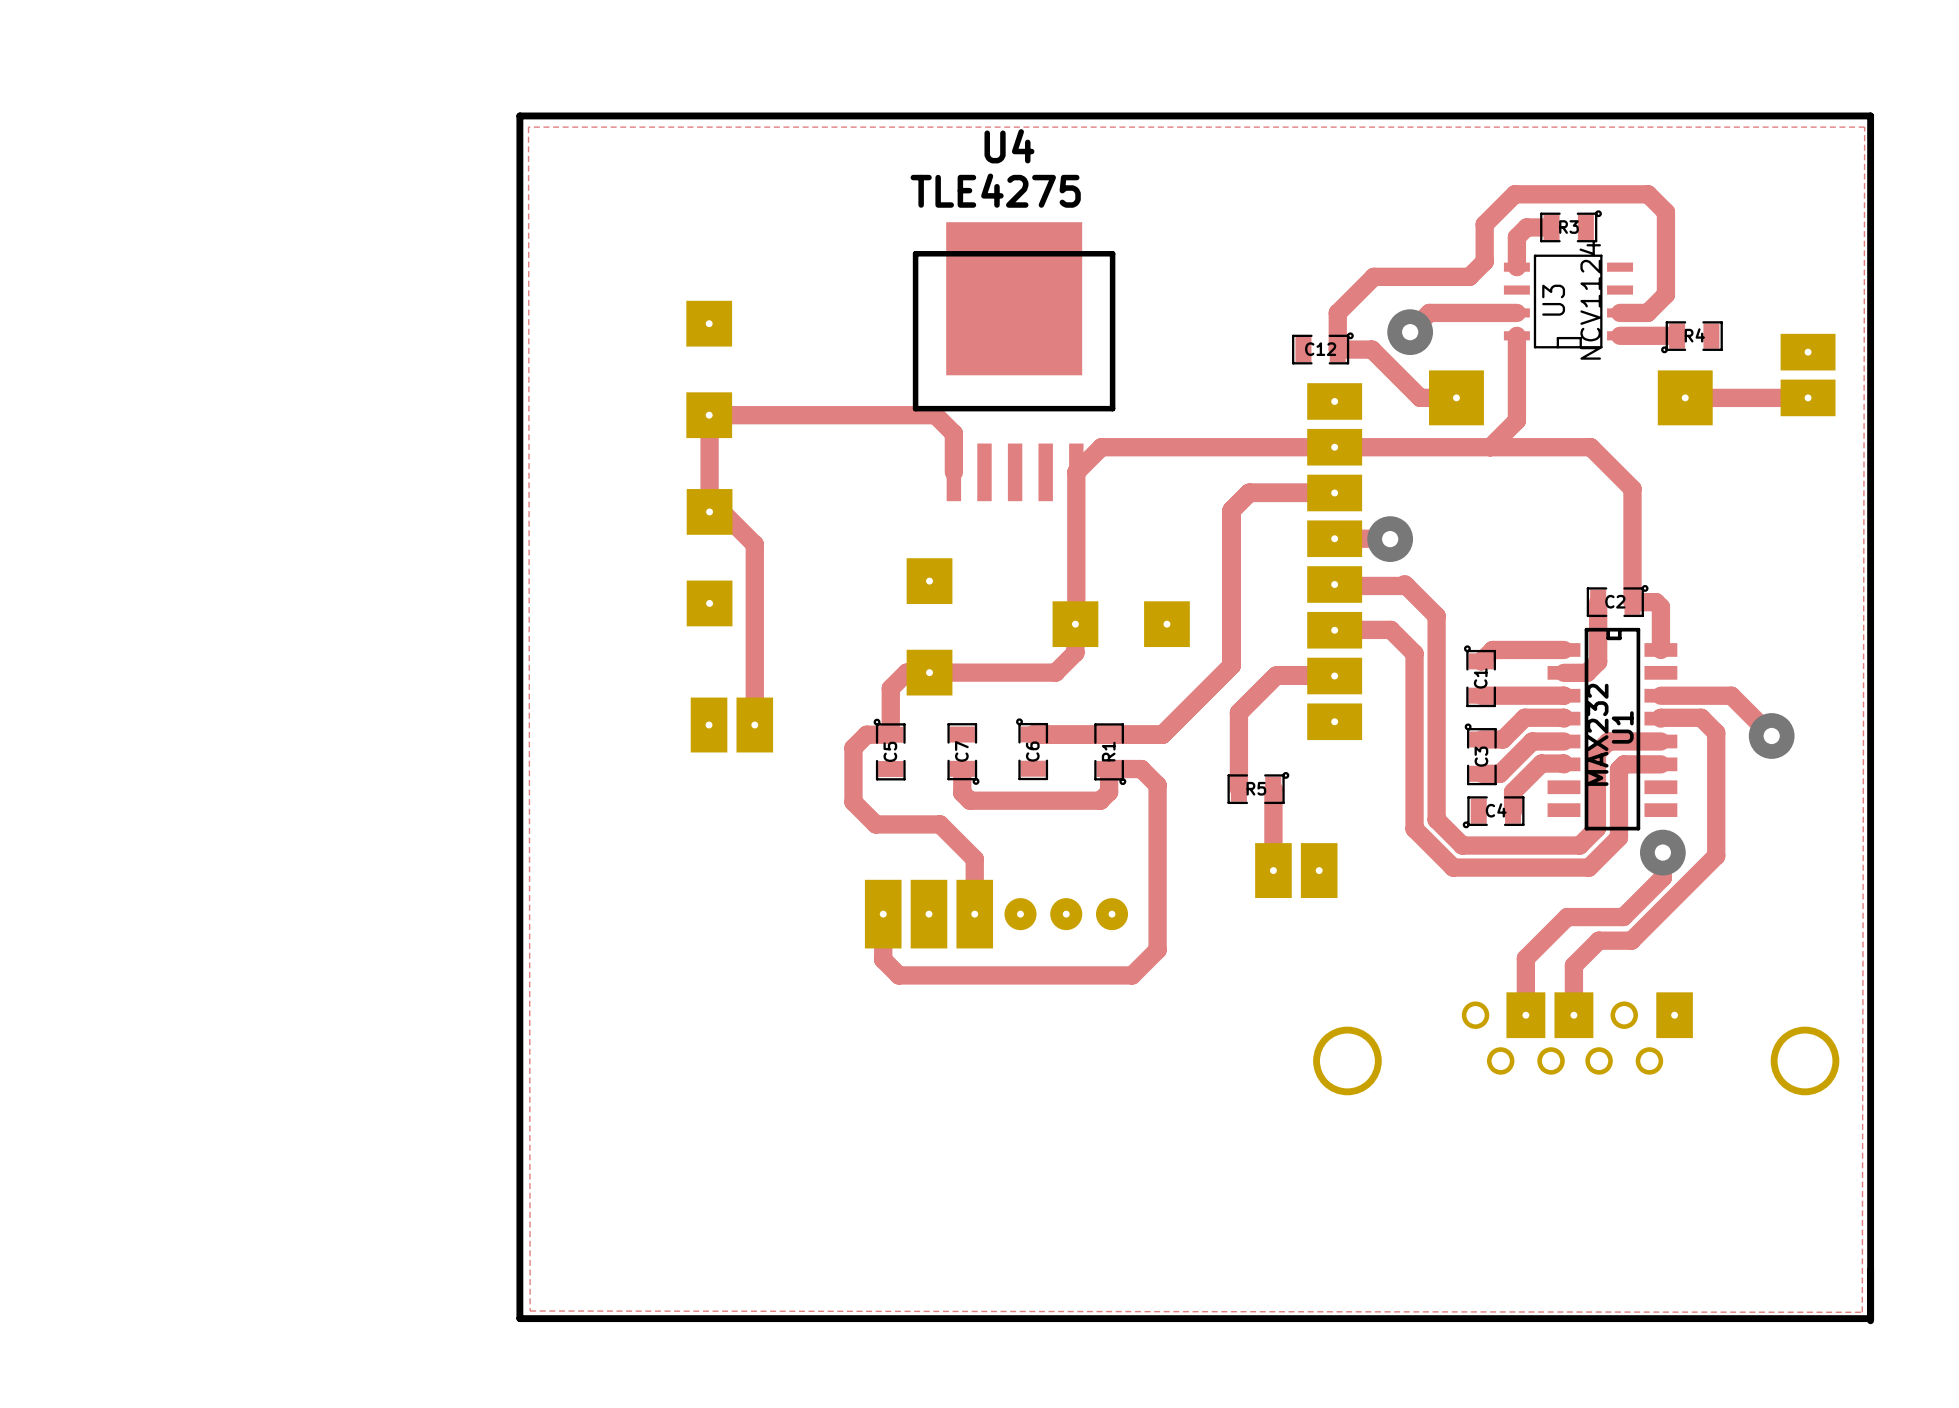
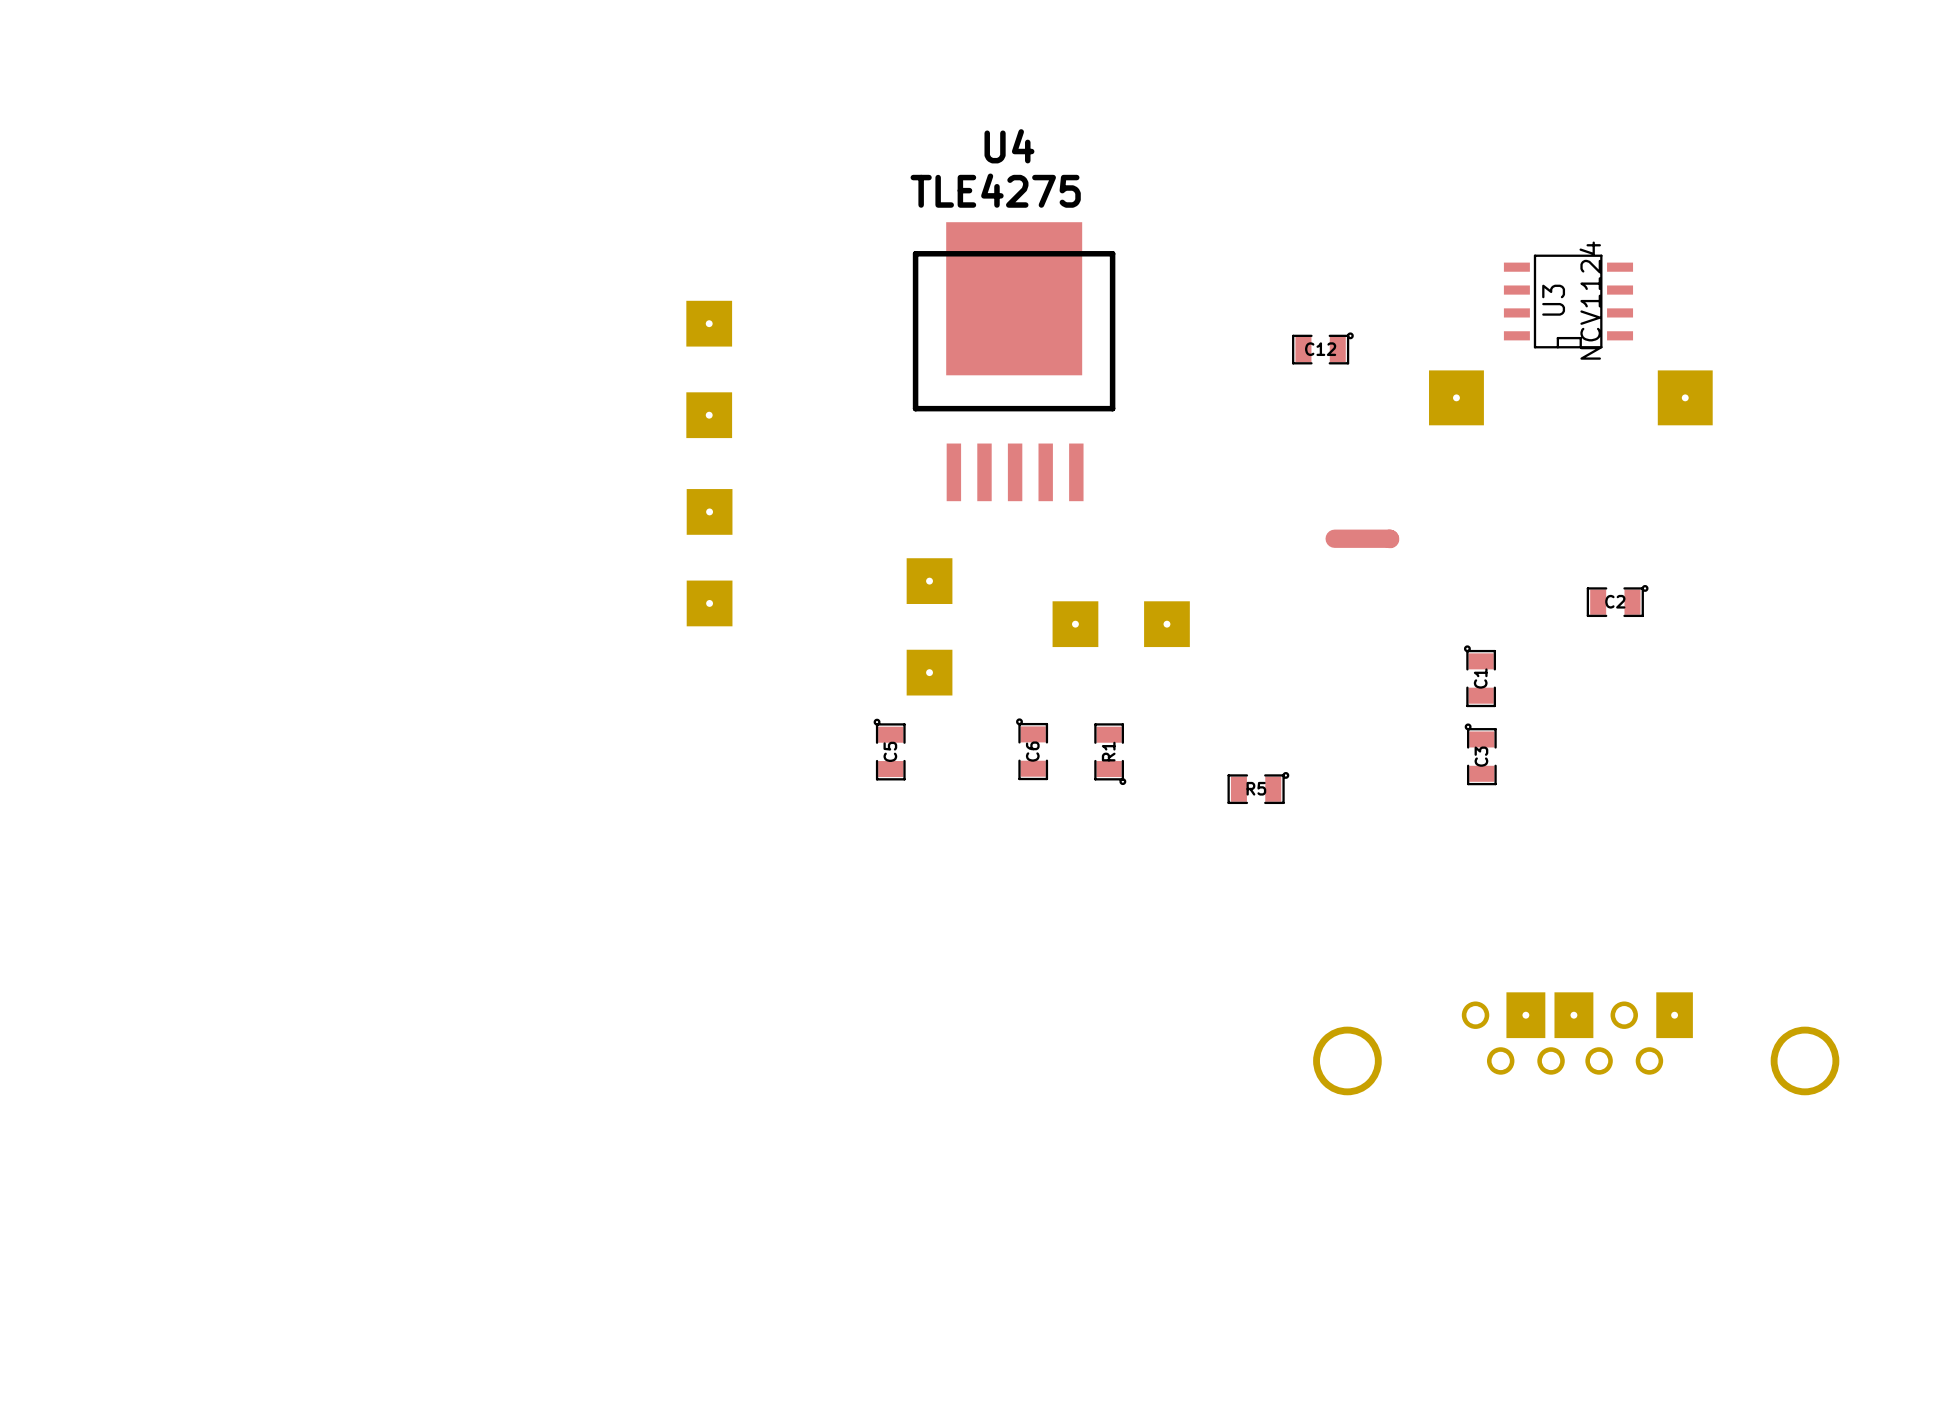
zone outline: (528, 127) (1864, 127) (1862, 1312) (530, 1311) (528, 127) -> none
R3: (1570, 226) -> none
track: (1551, 227) (1526, 227) (1516, 237) (1516, 267) -> none
track: (1516, 312) (1429, 312) (1410, 332) -> none
track: (1620, 312) (1647, 312) (1665, 294) (1665, 212) (1648, 194) (1514, 194) (1484, 224) (1484, 261) (1469, 276) (1373, 276) (1337, 313) (1337, 349) (1371, 349) (1420, 397) (1456, 397) -> none
via: (1410, 332) -> none
track: (1516, 335) (1516, 420) (1490, 447) -> none
track: (1620, 335) (1677, 336) -> none
R4: (1691, 337) -> none
part: (1808, 375) -> none
track: (1685, 397) (1808, 397) -> none
track: (953, 472) (953, 433) (935, 415) (709, 415) (709, 511) (722, 511) (754, 544) (754, 725) -> none
track: (1334, 492) (1249, 492) (1231, 510) (1231, 665) (1162, 734) (1033, 734) -> none
via: (1390, 539) -> none
part: (1334, 561) -> none
track: (1334, 584) (1406, 585) -> none
track: (1404, 584) (1436, 616) (1436, 819) (1462, 845) (1579, 845) (1596, 828) (1596, 752) (1608, 741) (1660, 741) -> none
track: (1598, 602) (1598, 661) (1587, 672) (1563, 672) -> none
track: (1334, 630) (1390, 629) (1414, 653) (1414, 828) (1453, 867) (1589, 867) (1618, 837) (1618, 769) (1624, 764) (1660, 764) -> none
track: (1563, 649) (1492, 649) (1481, 661) -> none
track: (1660, 649) (1660, 607) (1656, 602) (1632, 602) (1632, 488) (1590, 447) (1101, 447) (1076, 472) (1075, 652) (1055, 672) (906, 672) (890, 688) (890, 734) (866, 734) (853, 747) (853, 802) (875, 824) (940, 824) (974, 859) (974, 914) -> none
track: (1334, 675) (1276, 675) (1238, 712) (1238, 789) -> none
track: (1481, 695) (1563, 695) -> none
track: (1660, 695) (1731, 695) (1771, 736) -> none
track: (1563, 718) (1524, 717) (1503, 739) (1481, 739) -> none
track: (1660, 718) (1701, 717) (1716, 732) (1716, 855) (1631, 940) (1598, 940) (1573, 965) (1573, 1015) -> none
part: (731, 725) -> none
U1: MAX232 (1612, 729) -> none
via: (1771, 736) -> none
track: (1563, 741) (1532, 741) (1499, 773) (1481, 773) -> none
C7: (963, 753) -> none
track: (1563, 764) (1541, 763) (1513, 792) (1513, 811) -> none
track: (962, 768) (962, 792) (970, 800) (1100, 800) (1109, 792) (1109, 769) (1141, 769) (1157, 785) (1157, 950) (1132, 975) (898, 975) (883, 959) (883, 914) -> none
track: (1273, 789) (1273, 870) -> none
C4: (1493, 812) -> none
track: (1662, 852) (1662, 877) (1623, 917) (1567, 917) (1525, 958) (1525, 1015) -> none
via: (1662, 852) -> none
part: (1296, 870) -> none
part: (996, 914) -> none
board edge: (1870, 1318) (519, 1318) (519, 115) (1870, 115) (1870, 1320) -> none

